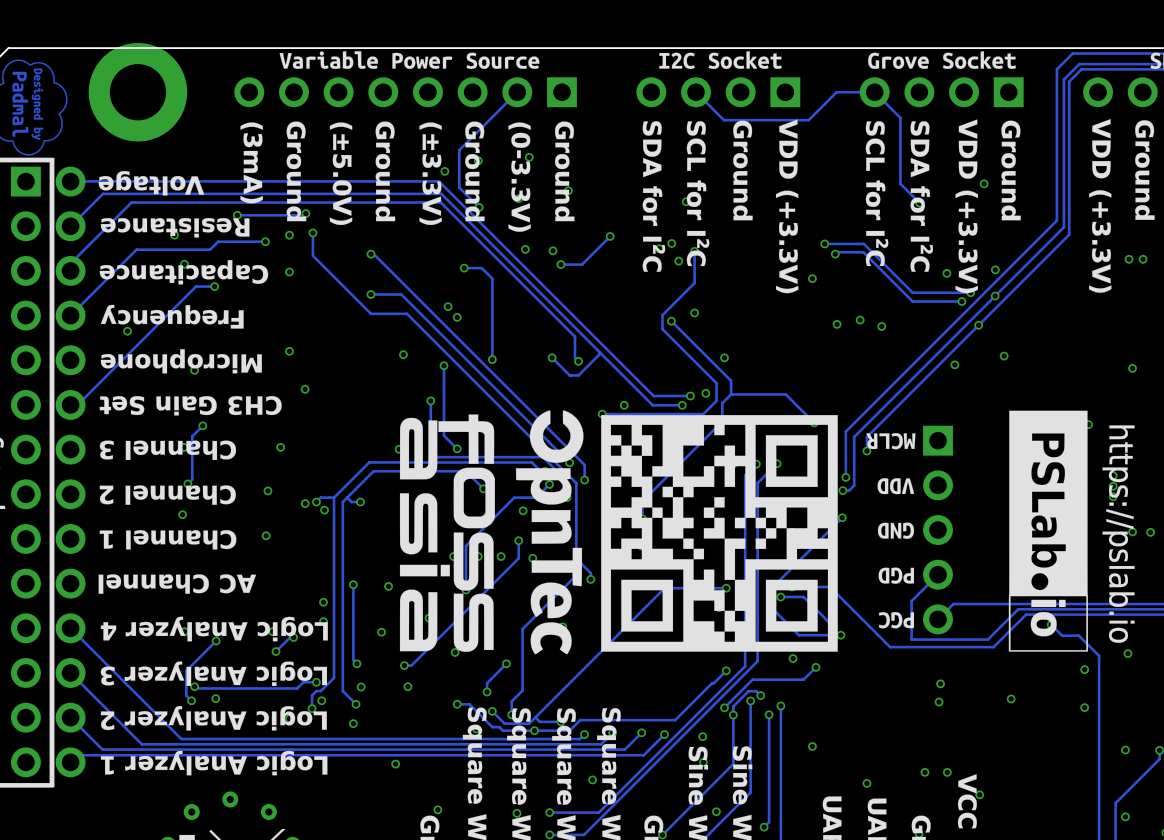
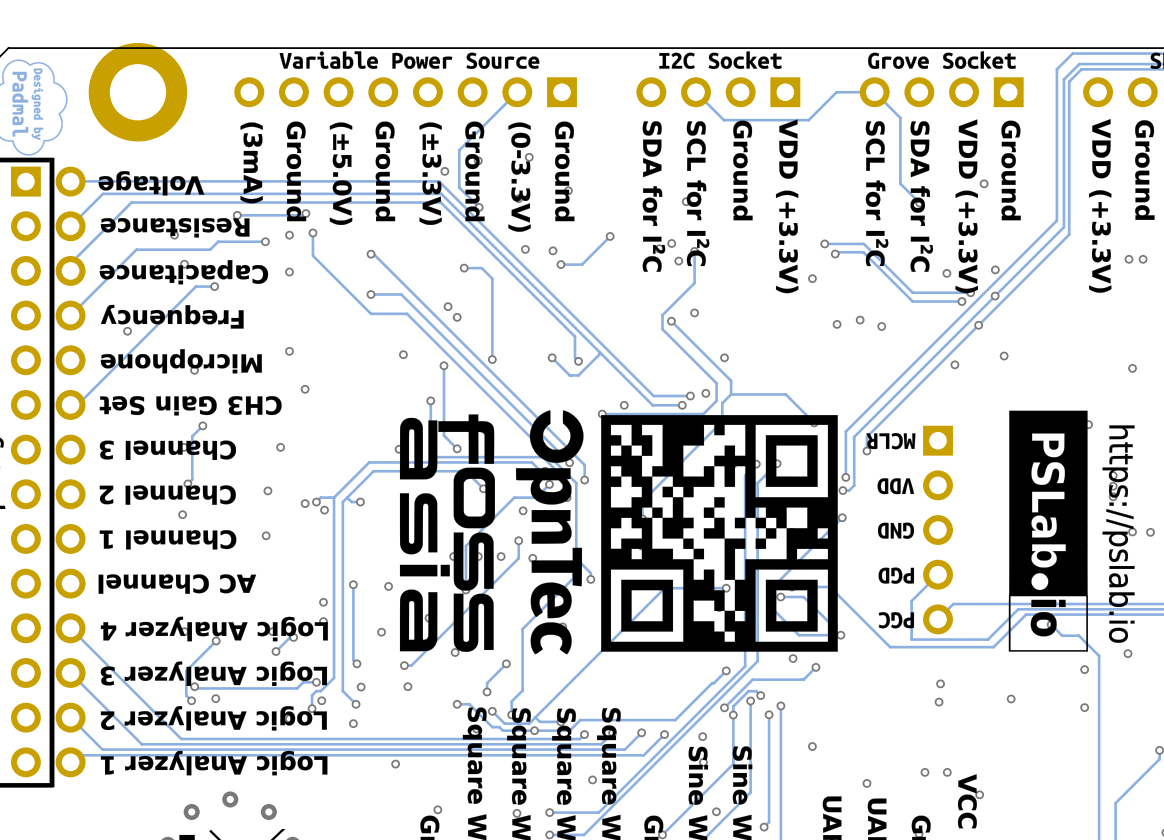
via: (1125, 750) -> none
via: (1125, 816) -> none

